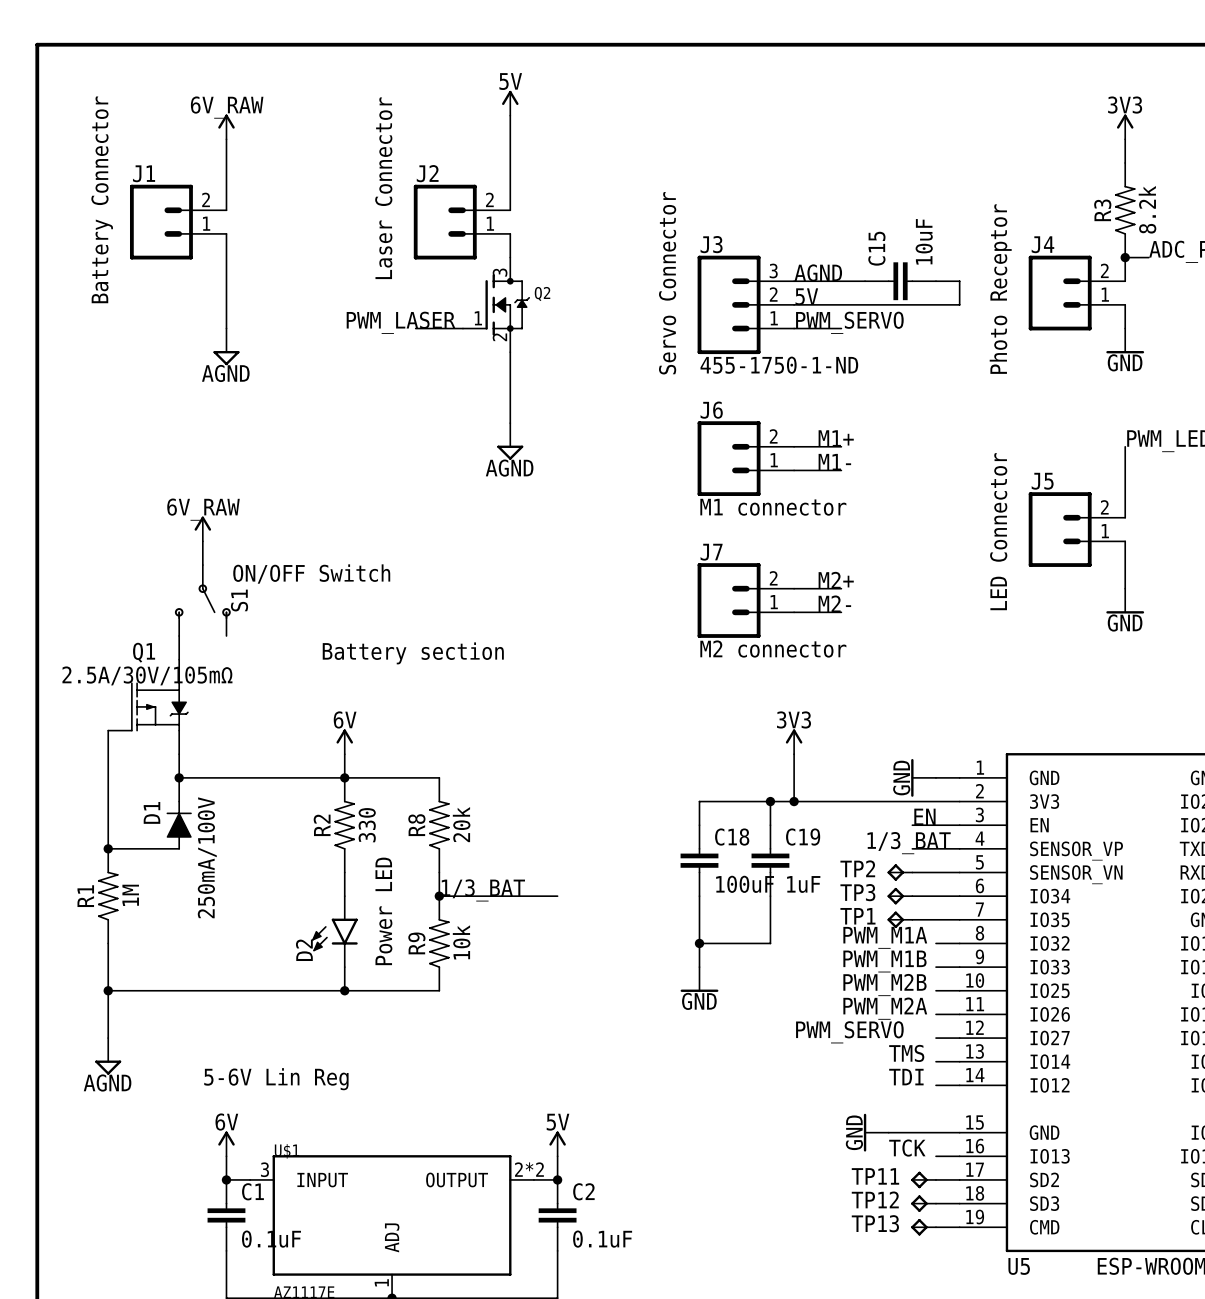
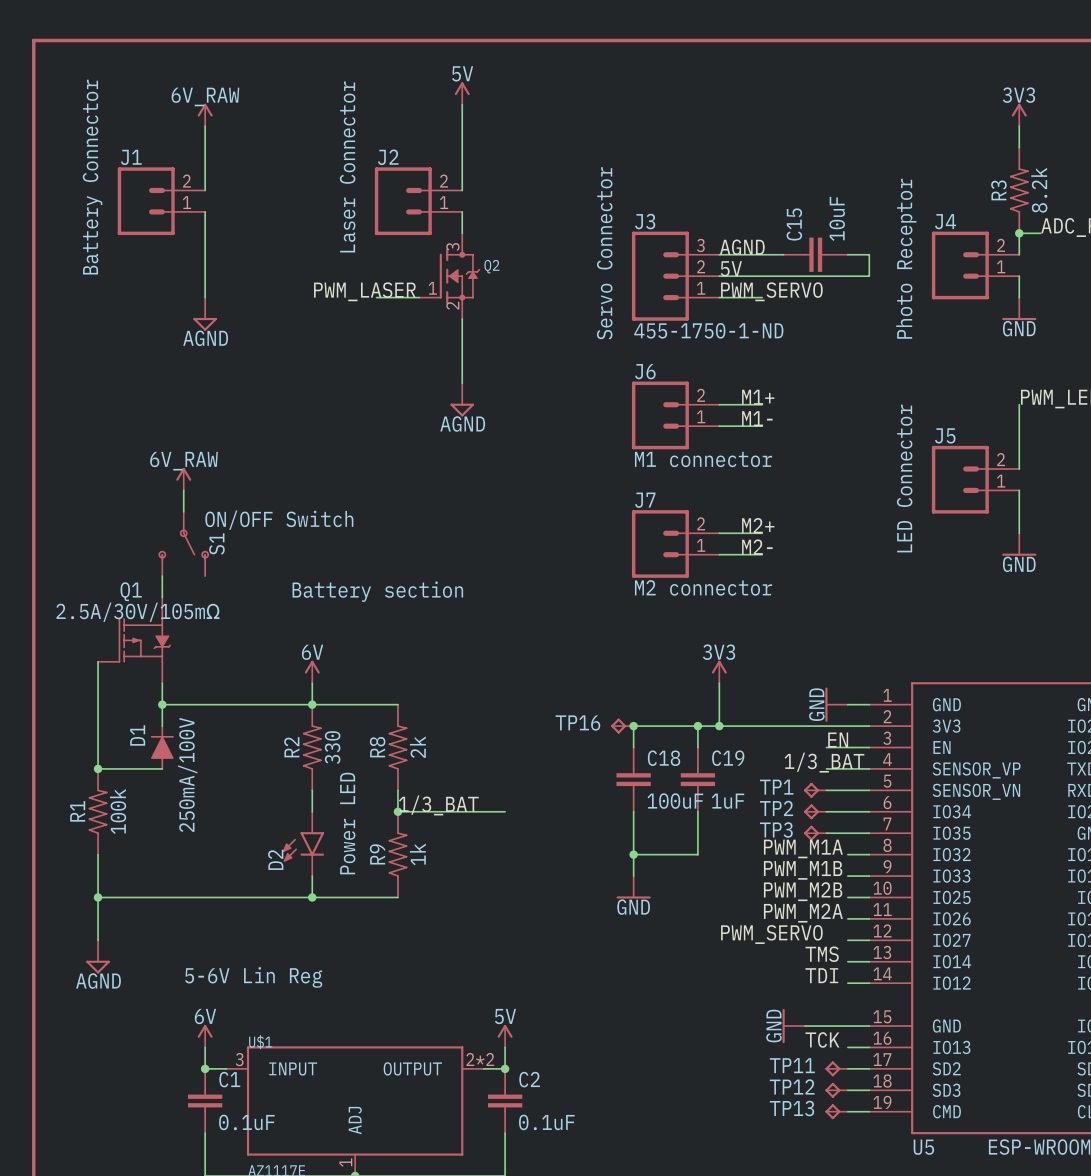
TP16: none -> (622, 726)
junction: none -> (633, 726)
R8 value: 20k (461, 824) -> 2k (417, 747)
TP2 name: TP2 (857, 868) -> TP1 (776, 787)
TP3 name: TP3 (857, 892) -> TP2 (776, 808)
R1 value: 1M (130, 895) -> 100k (118, 811)
TP1 name: TP1 (857, 916) -> TP3 (776, 829)
R9 value: 10k (461, 942) -> 1k (417, 854)

